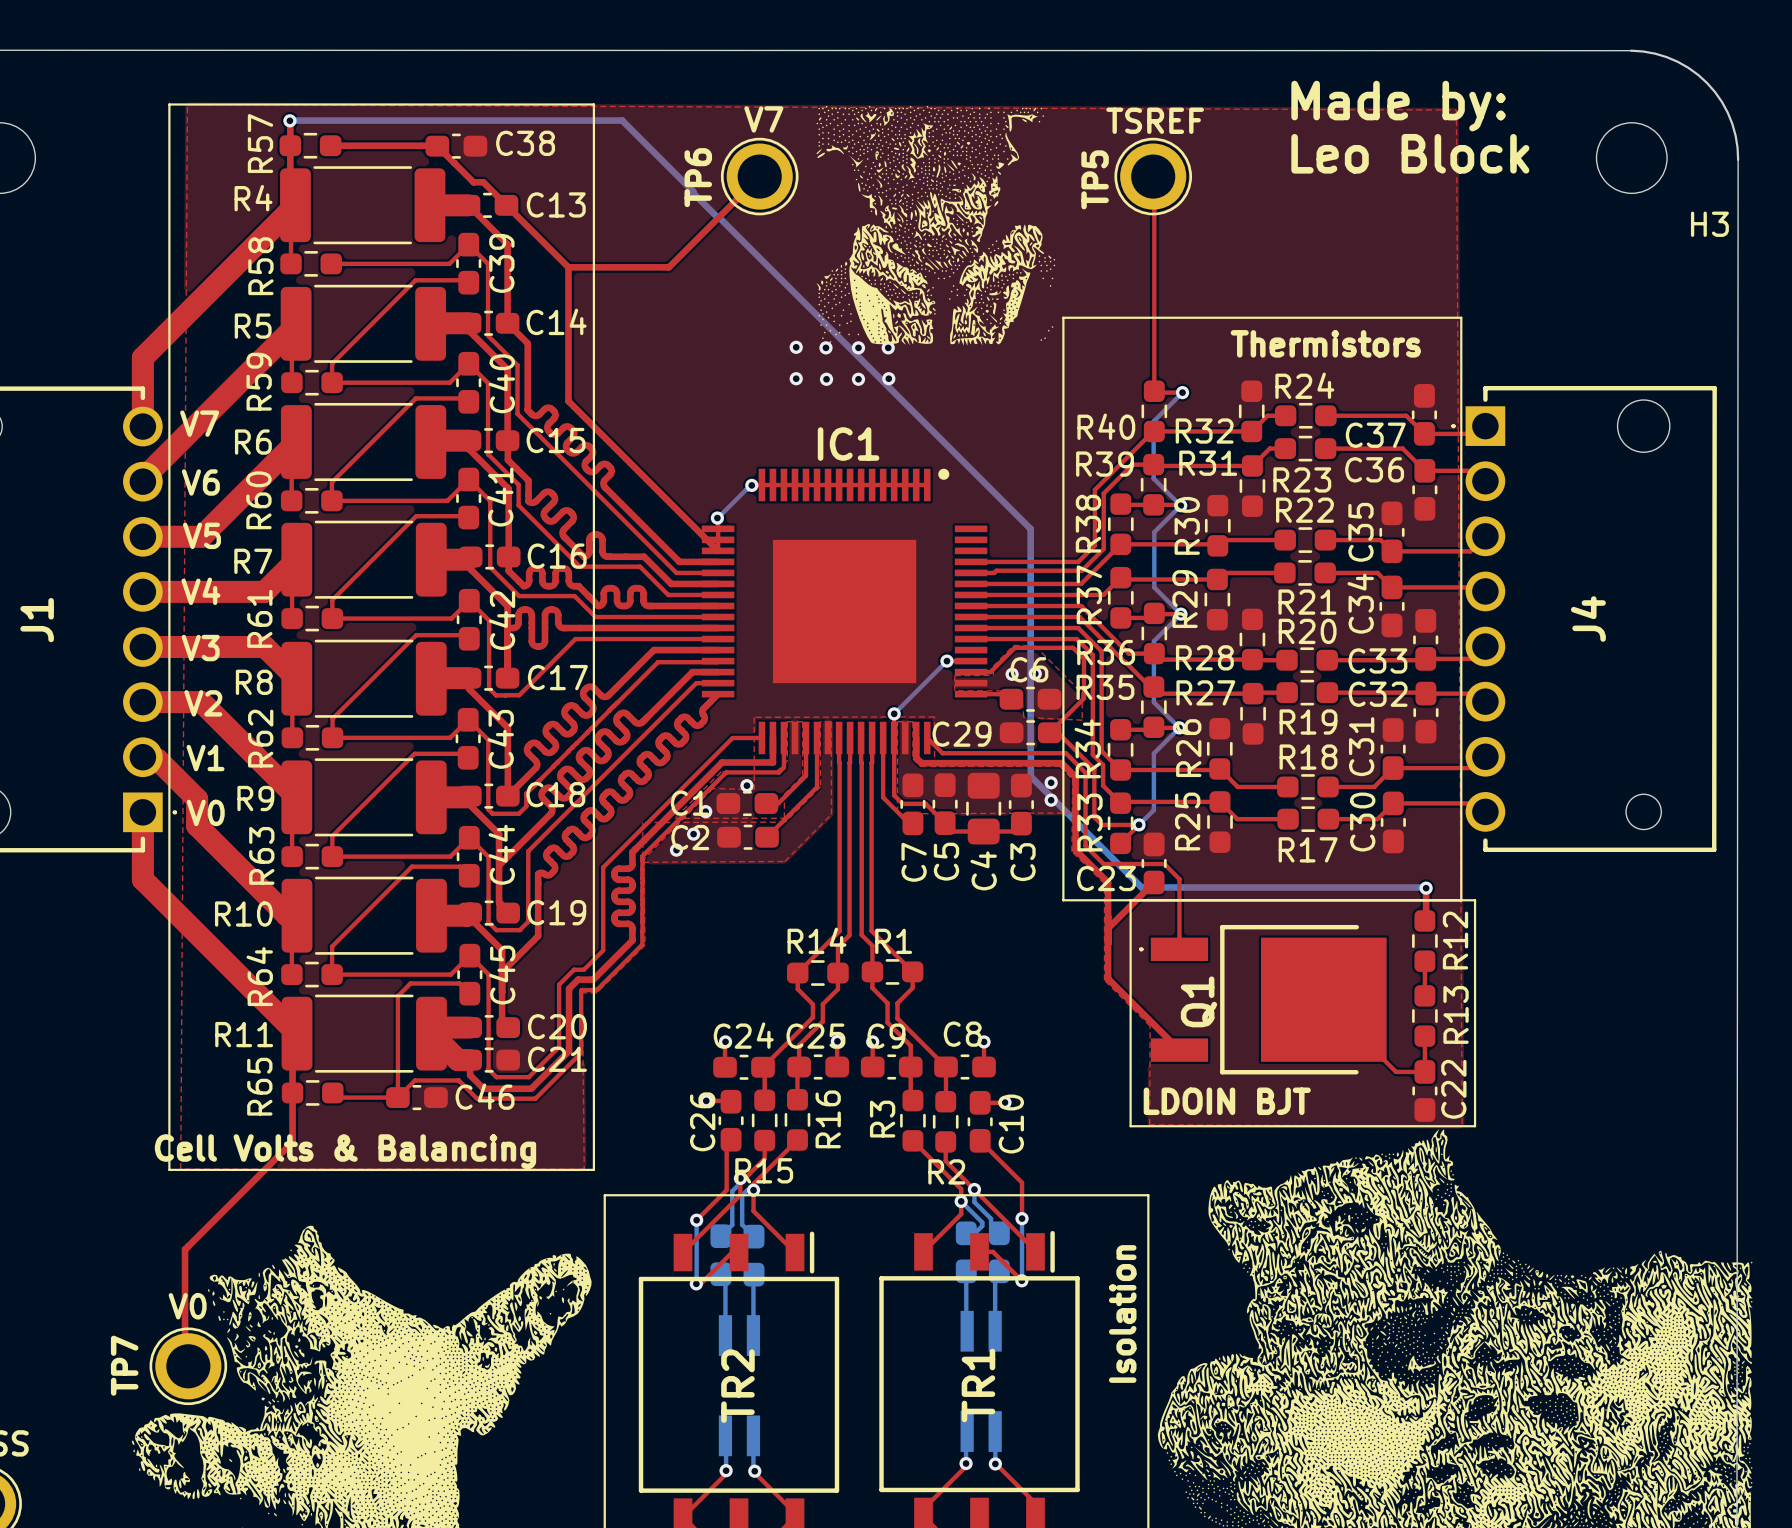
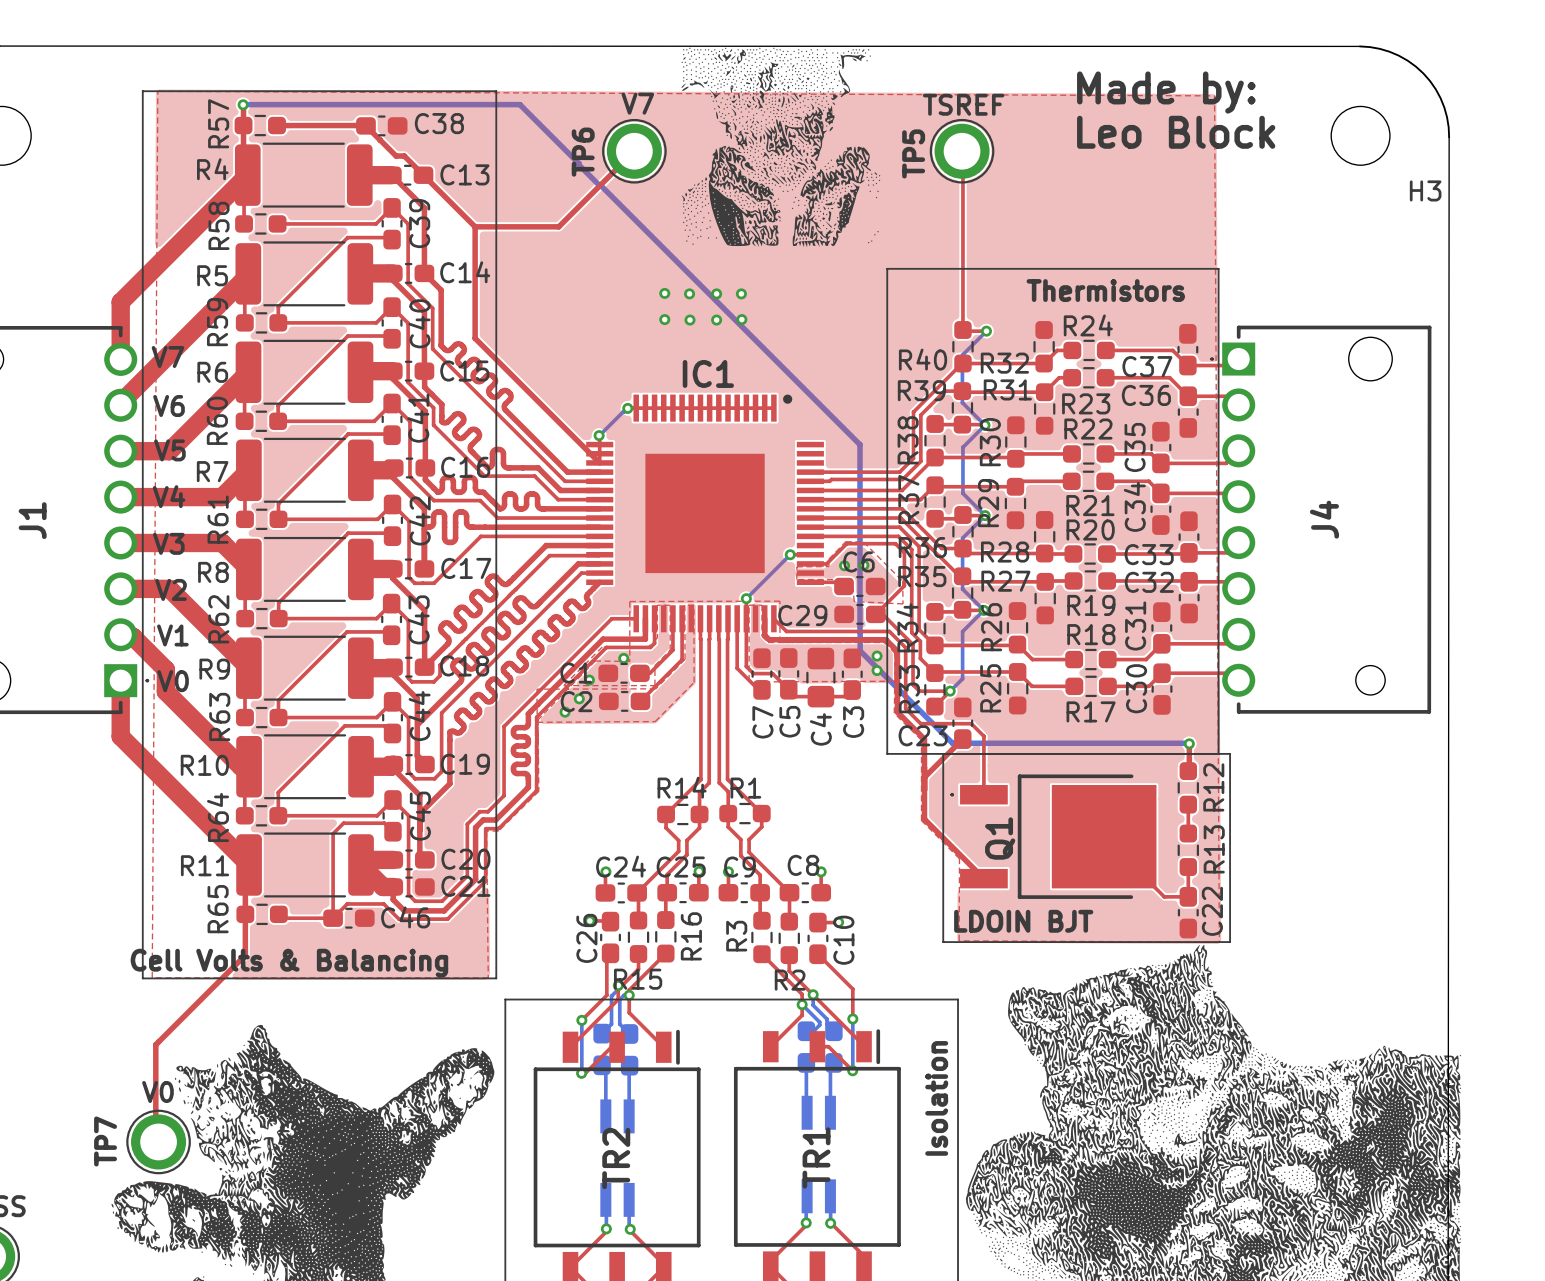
drawing position: (935, 225) -> (780, 147)

